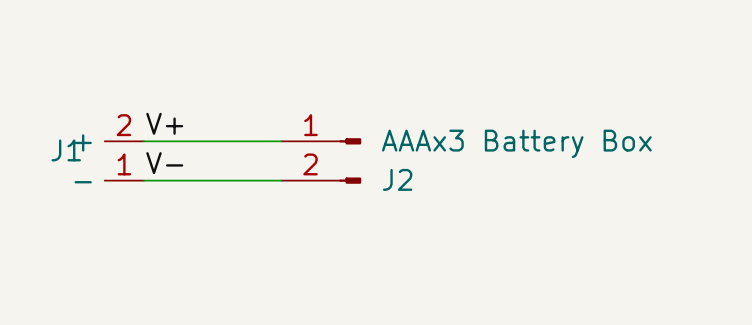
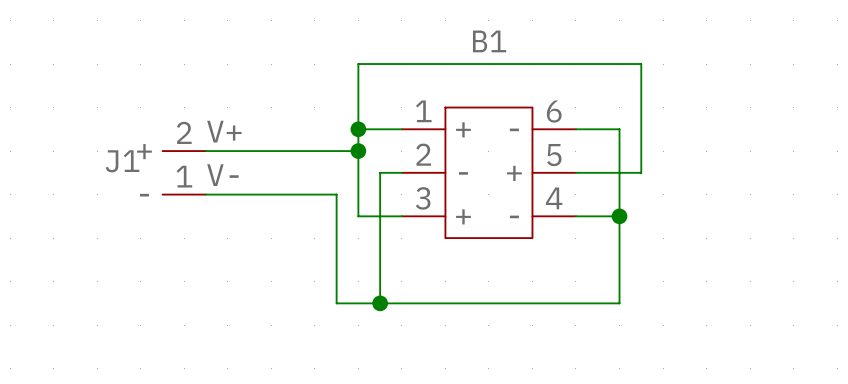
wire: none -> (358, 129) (401, 129)
junction: none -> (358, 129)
junction: none -> (358, 151)
wire: none -> (401, 172) (380, 172) (380, 303)
J2: AAAx3 Battery Box (321, 160) -> none
B1: none -> (488, 172)
wire: none -> (575, 172) (641, 172) (641, 64) (358, 64) (358, 216) (401, 216)
wire: (261, 180) (281, 180) -> (336, 194) (336, 303) (619, 303) (619, 129) (575, 129)
wire: none -> (575, 216) (619, 216)
junction: none -> (619, 216)
junction: none -> (380, 303)

